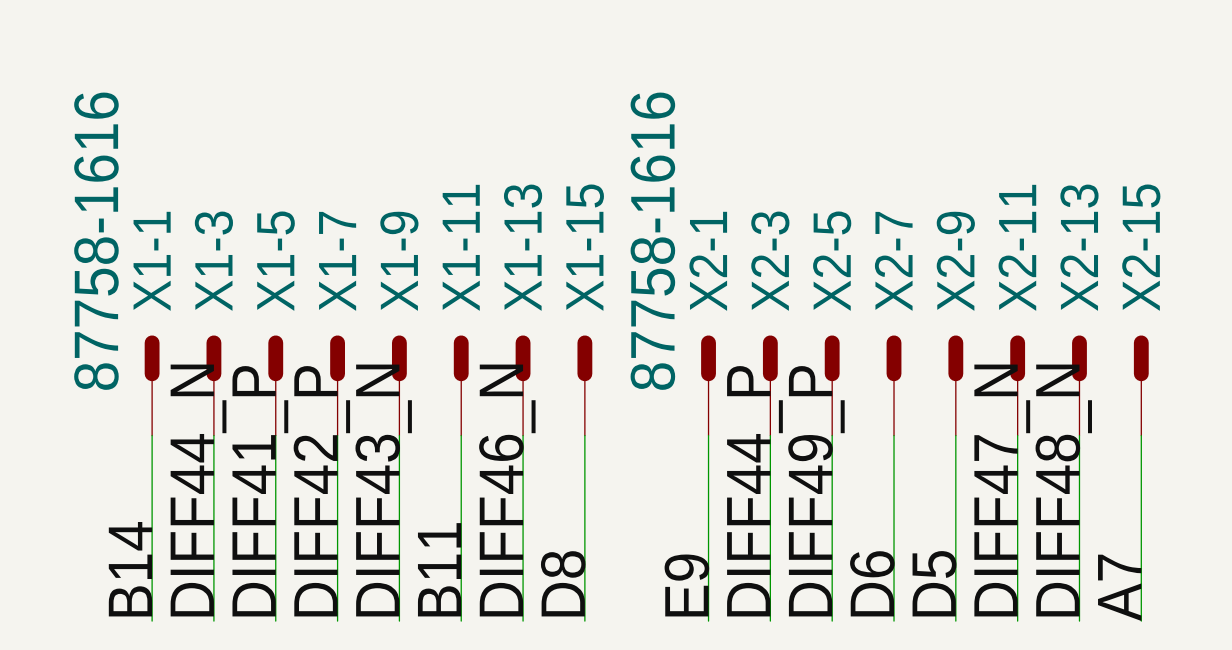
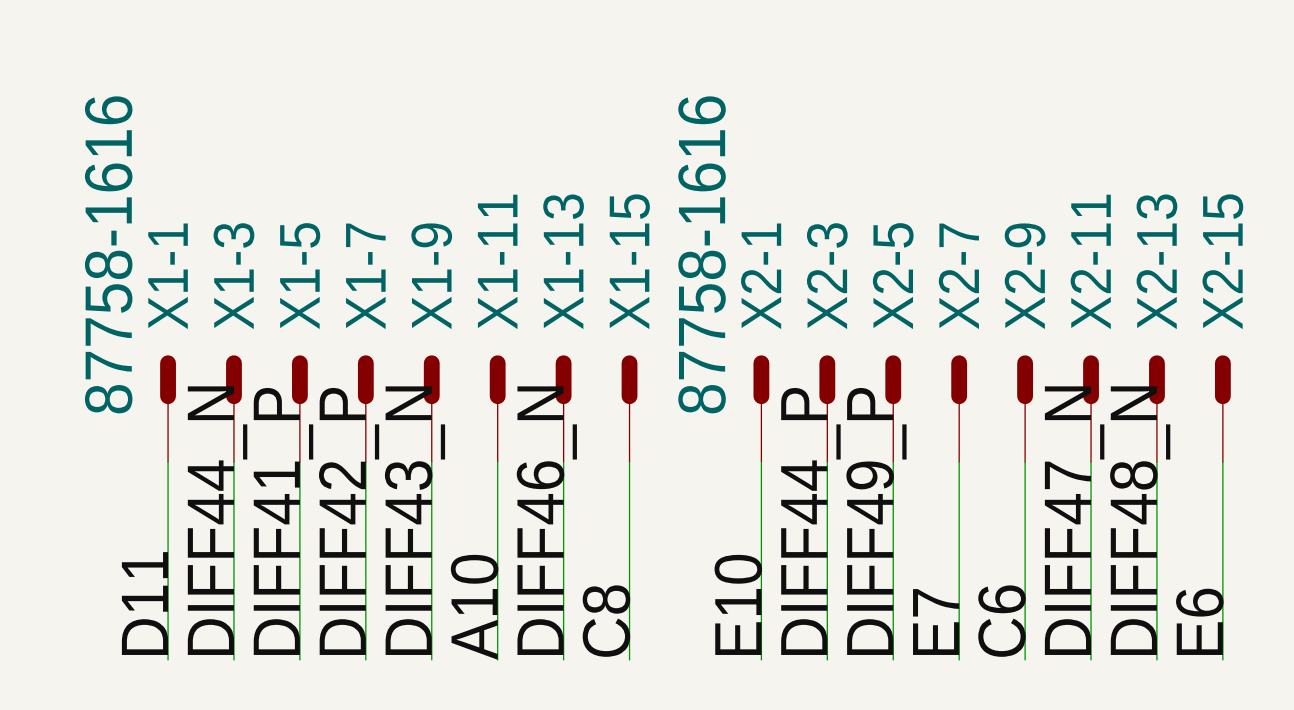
label: B14 (130, 569) -> D11 (144, 603)
label: B11 (439, 569) -> A10 (474, 607)
label: D8 (563, 583) -> C8 (606, 621)
label: D6 (872, 583) -> E7 (936, 622)
label: D5 (934, 583) -> C6 (1002, 621)
label: E9 (686, 585) -> E10 (738, 604)
label: A7 (1119, 587) -> E6 (1199, 621)

